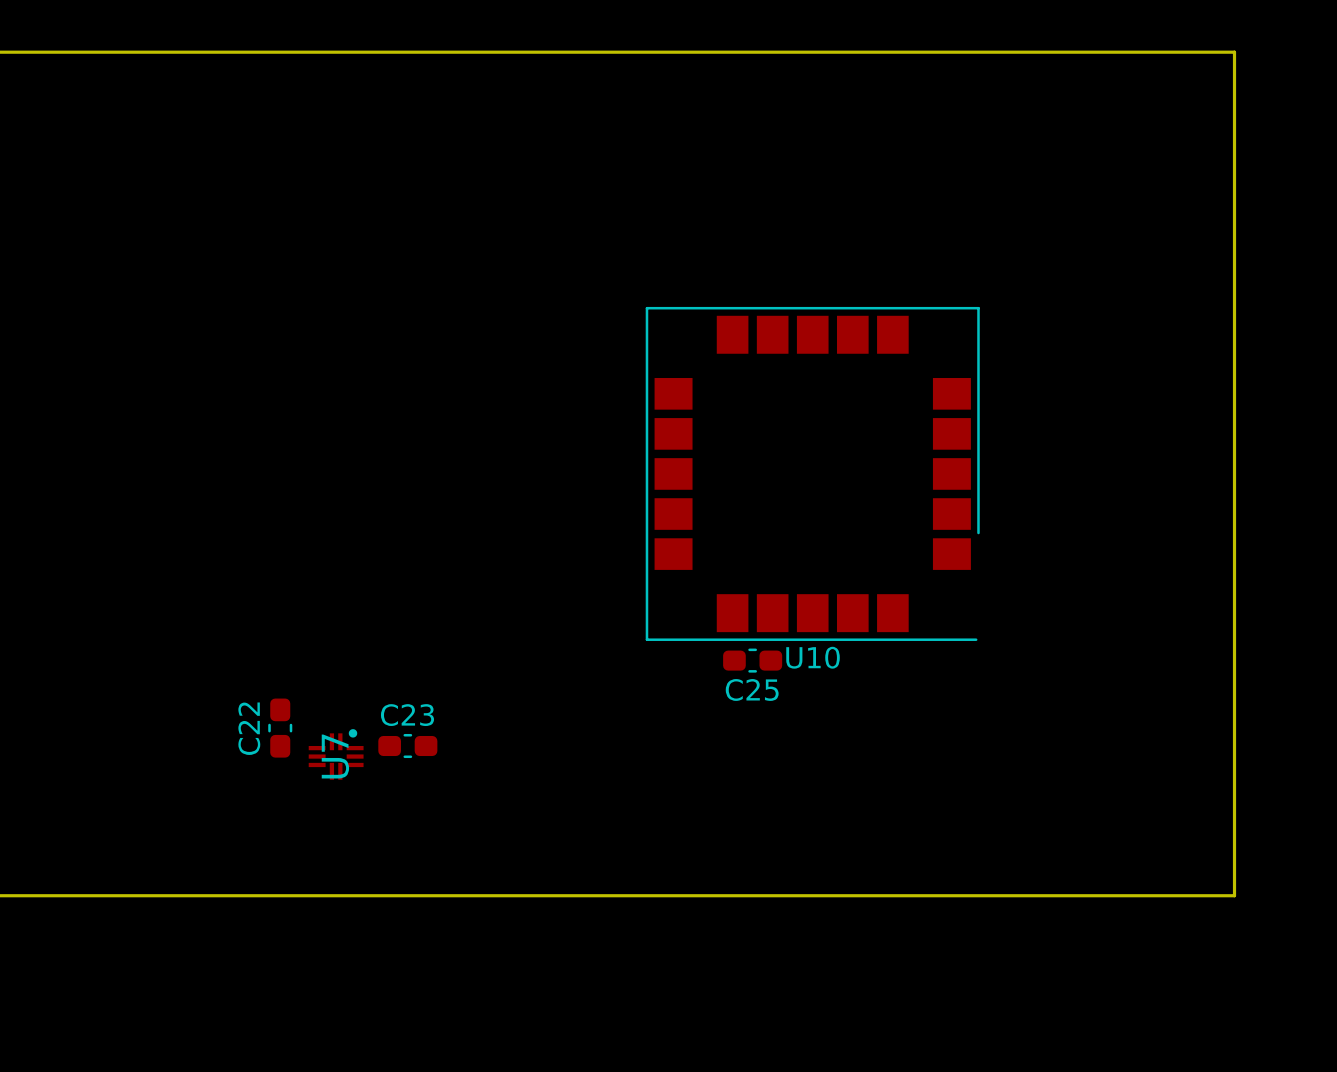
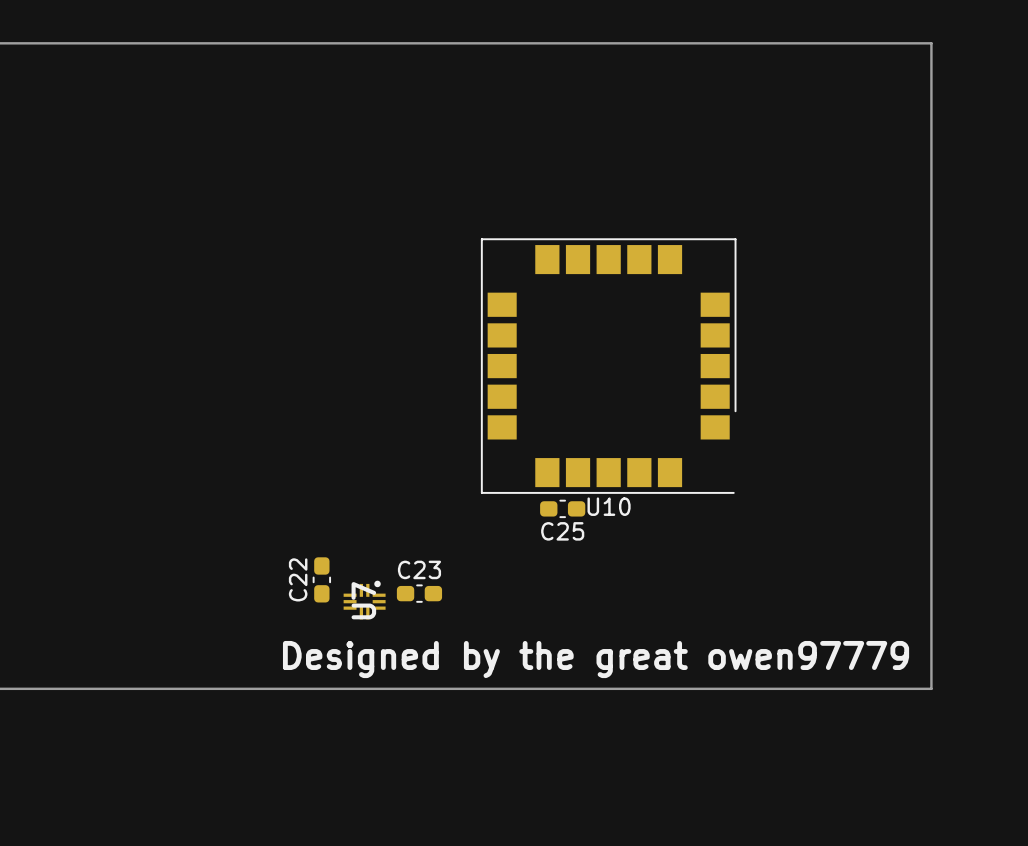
C22 position: (280, 728) -> (321, 579)
C23 position: (407, 746) -> (419, 593)
U7 position: (336, 754) -> (364, 600)
text: none -> Designed by the great owen97779 (596, 659)

